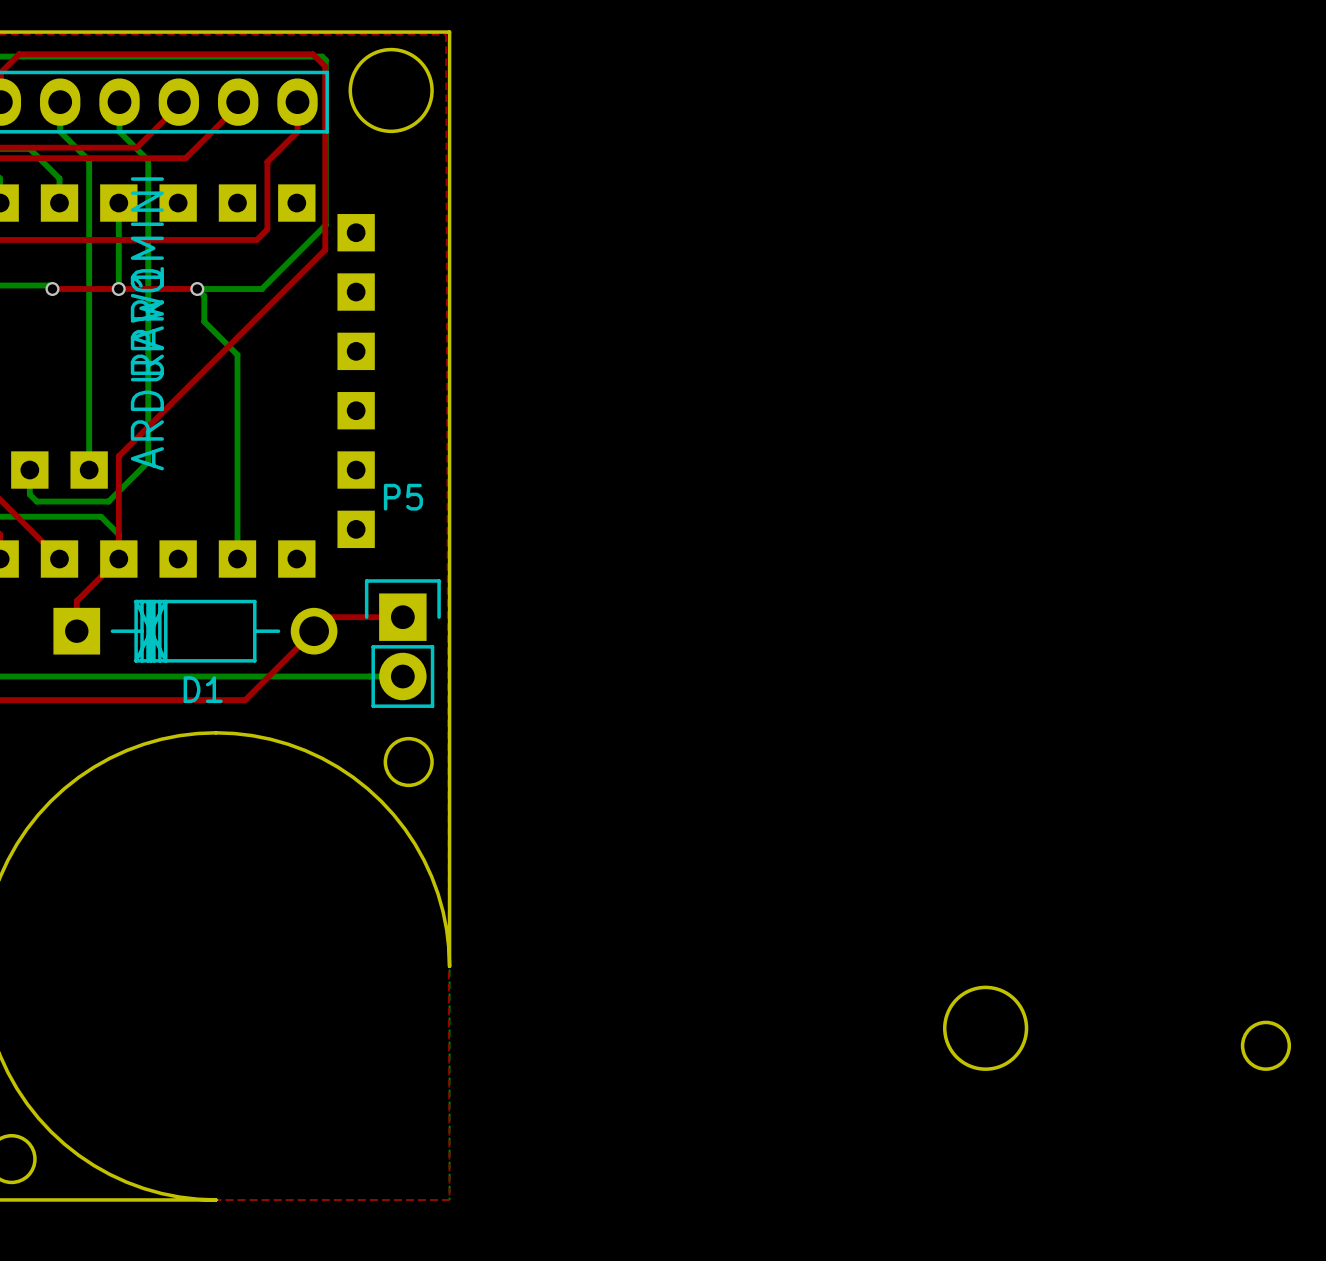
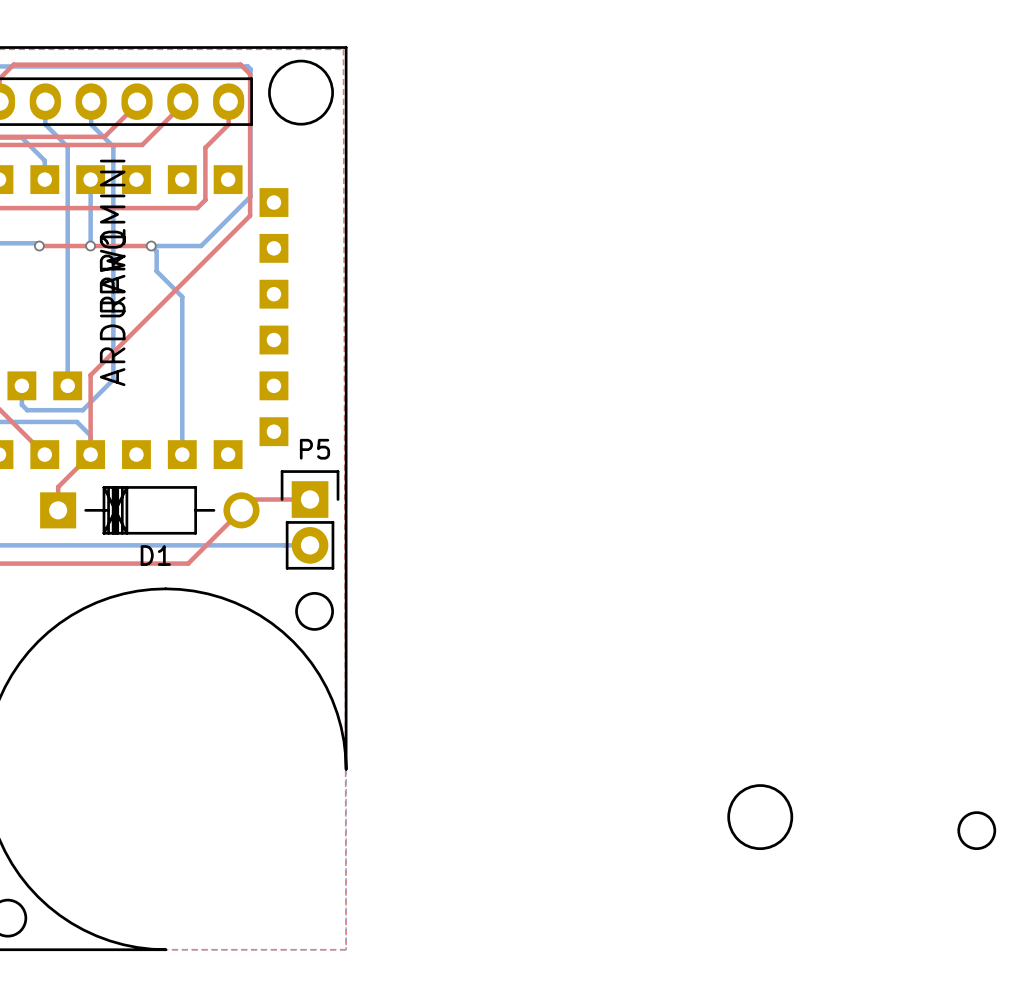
P5 name position: P5 (403, 497) -> P5 (314, 449)

